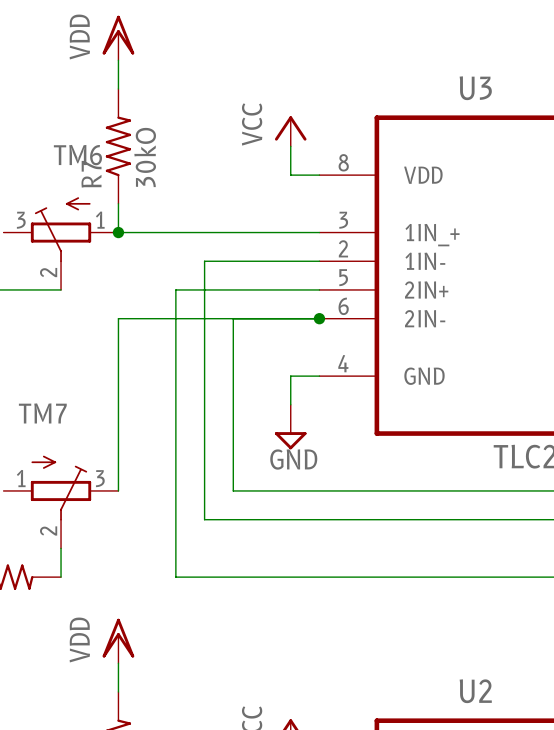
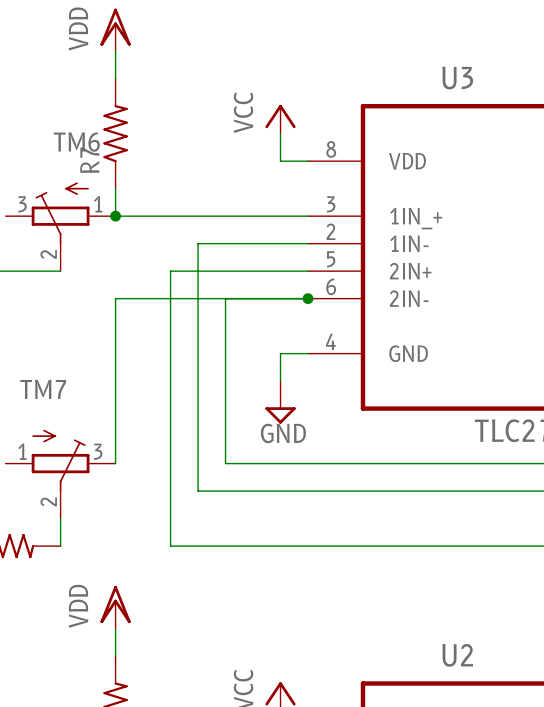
R7 value: 30kO (145, 157) -> none

